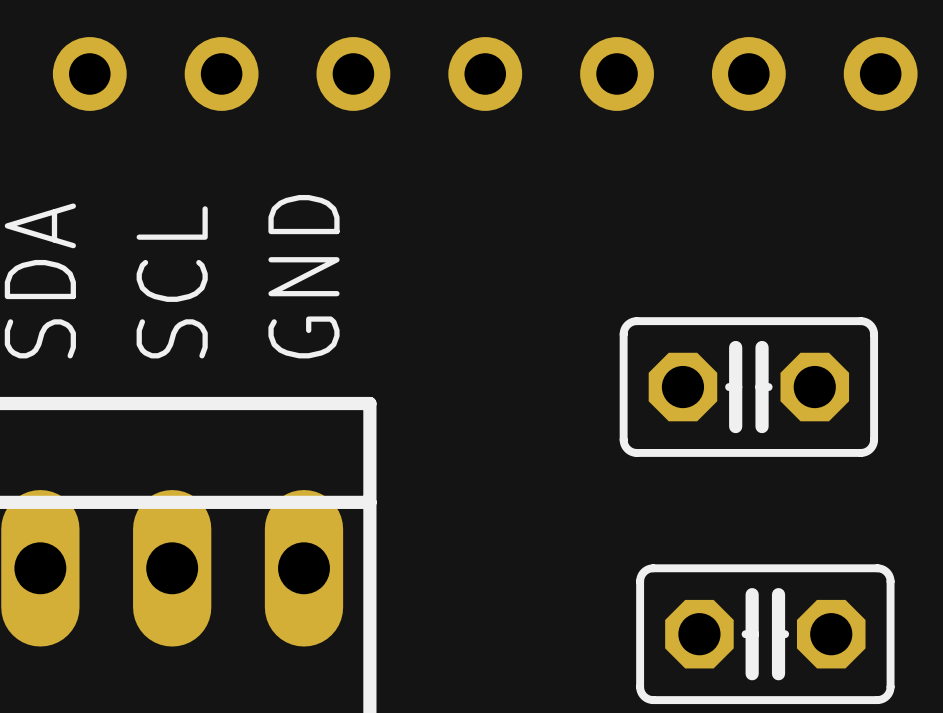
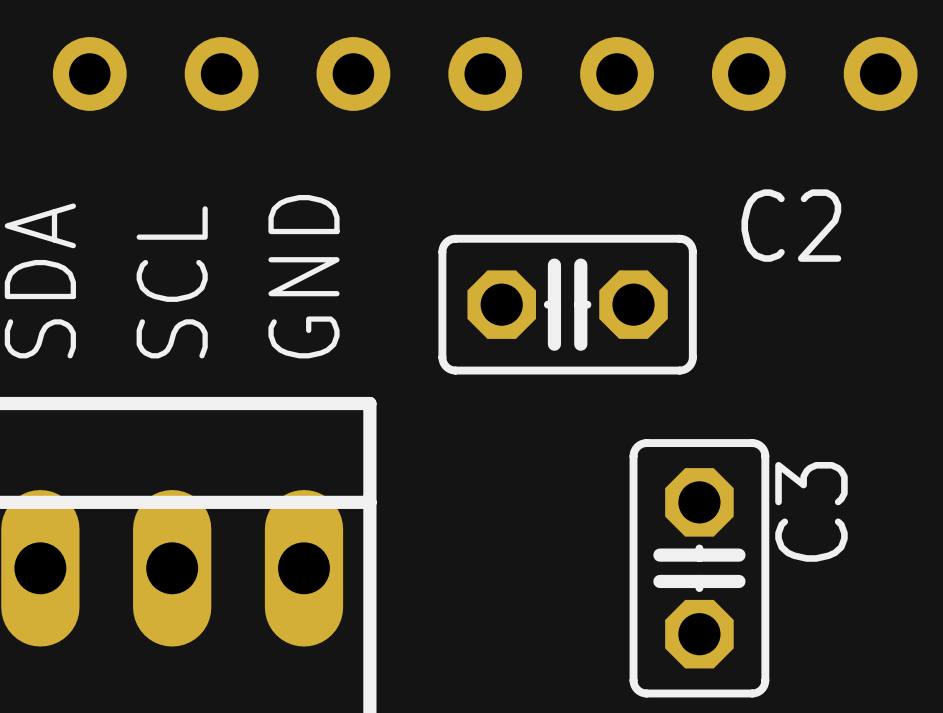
C2: none -> (567, 304)
part: (748, 387) -> none
C3: none -> (699, 568)
part: (765, 634) -> none

